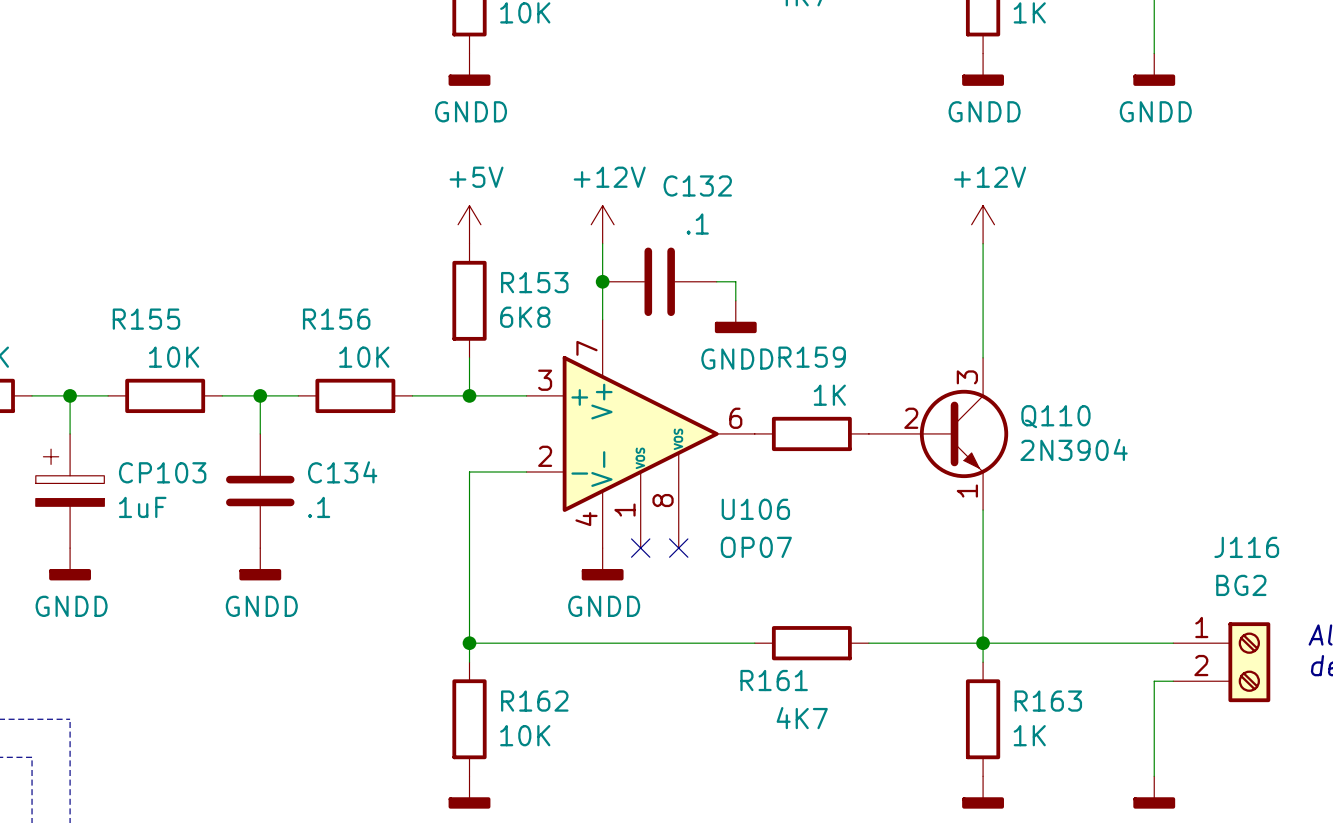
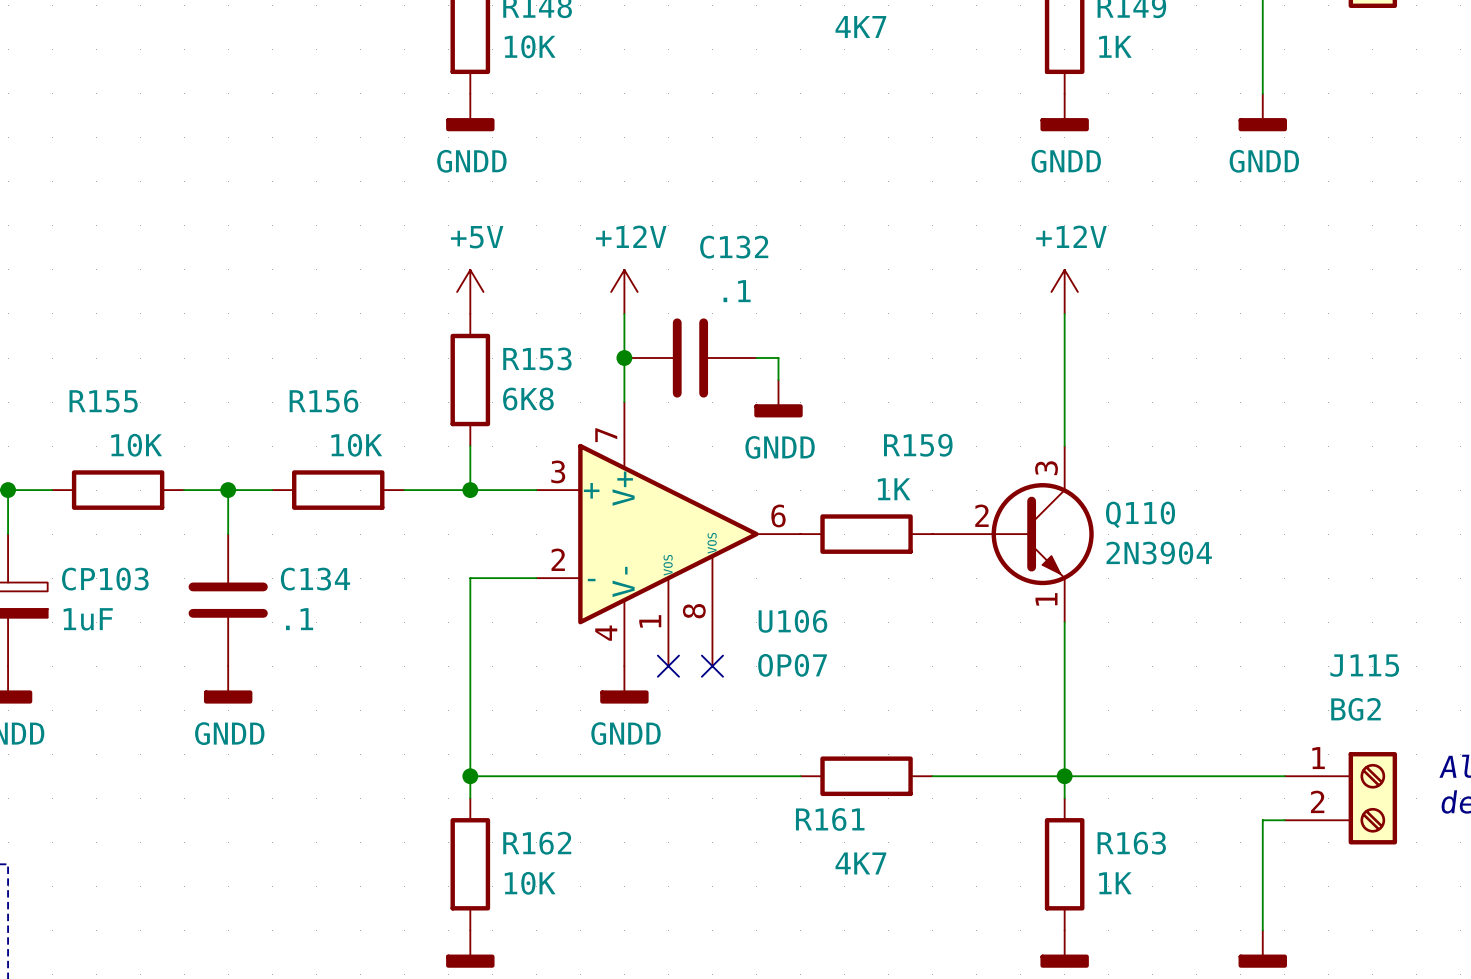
R159 name position: R159 (812, 357) -> R159 (918, 445)
J116 name: J116 (1246, 547) -> J115 (1364, 665)

